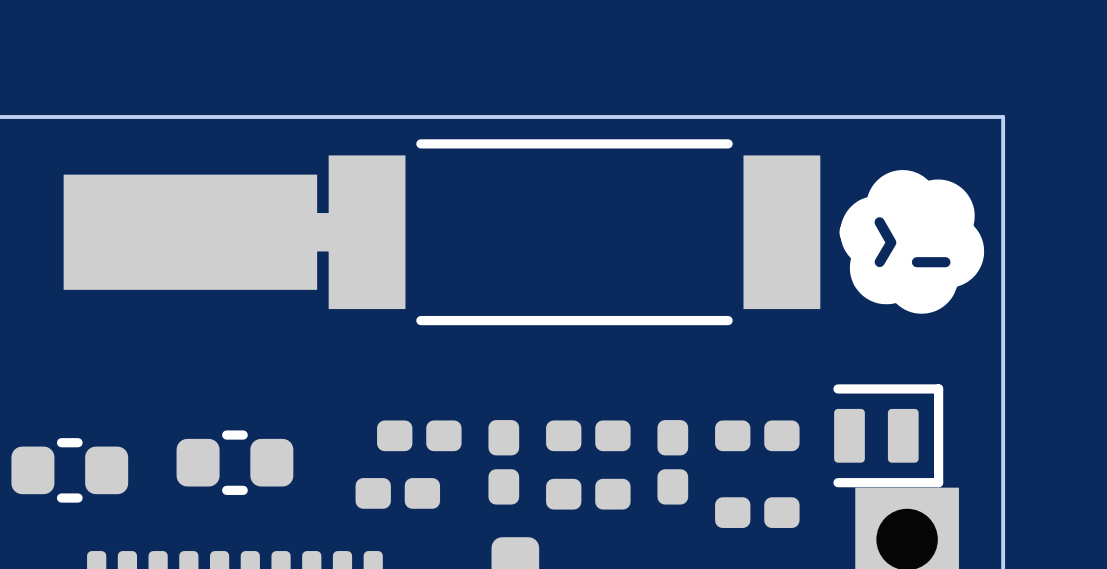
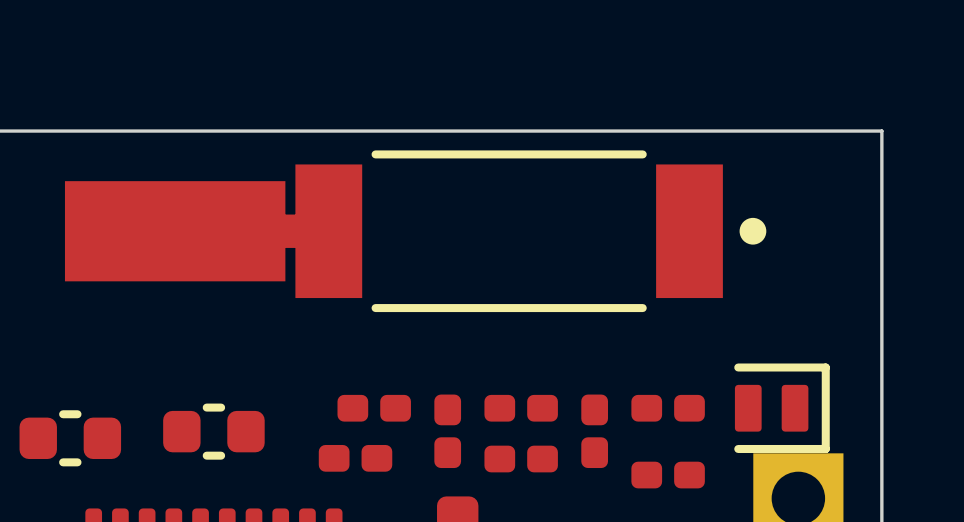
drawing: [840, 170, 985, 314] -> none

